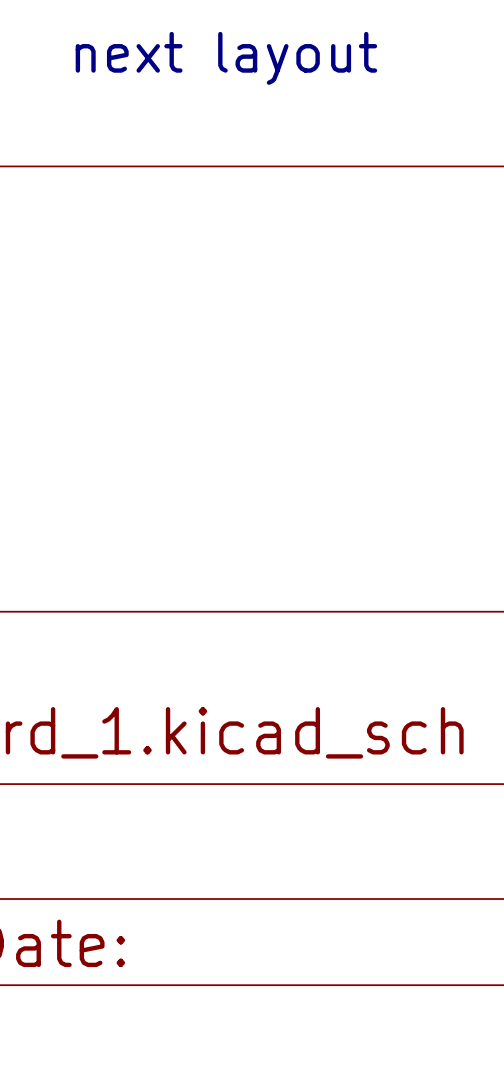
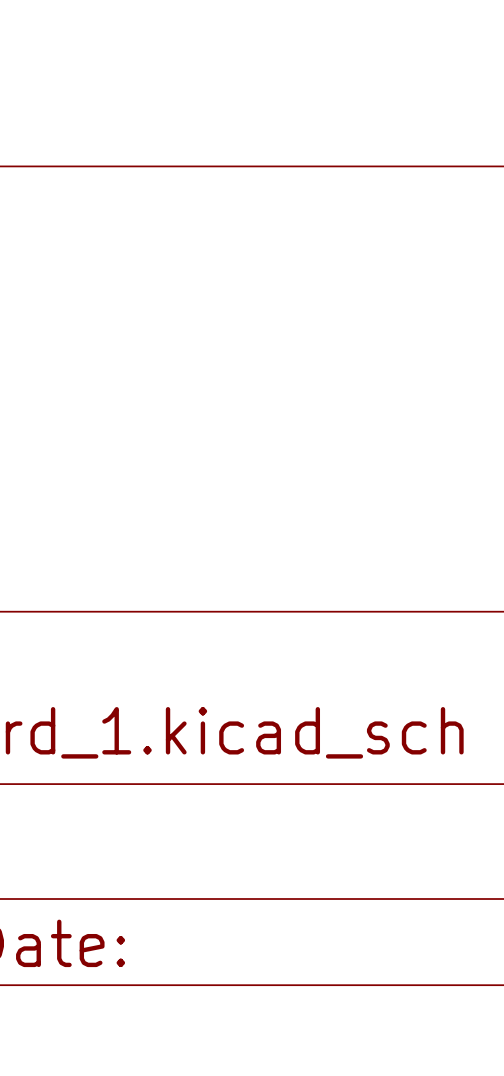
text: next layout (226, 58) -> none

